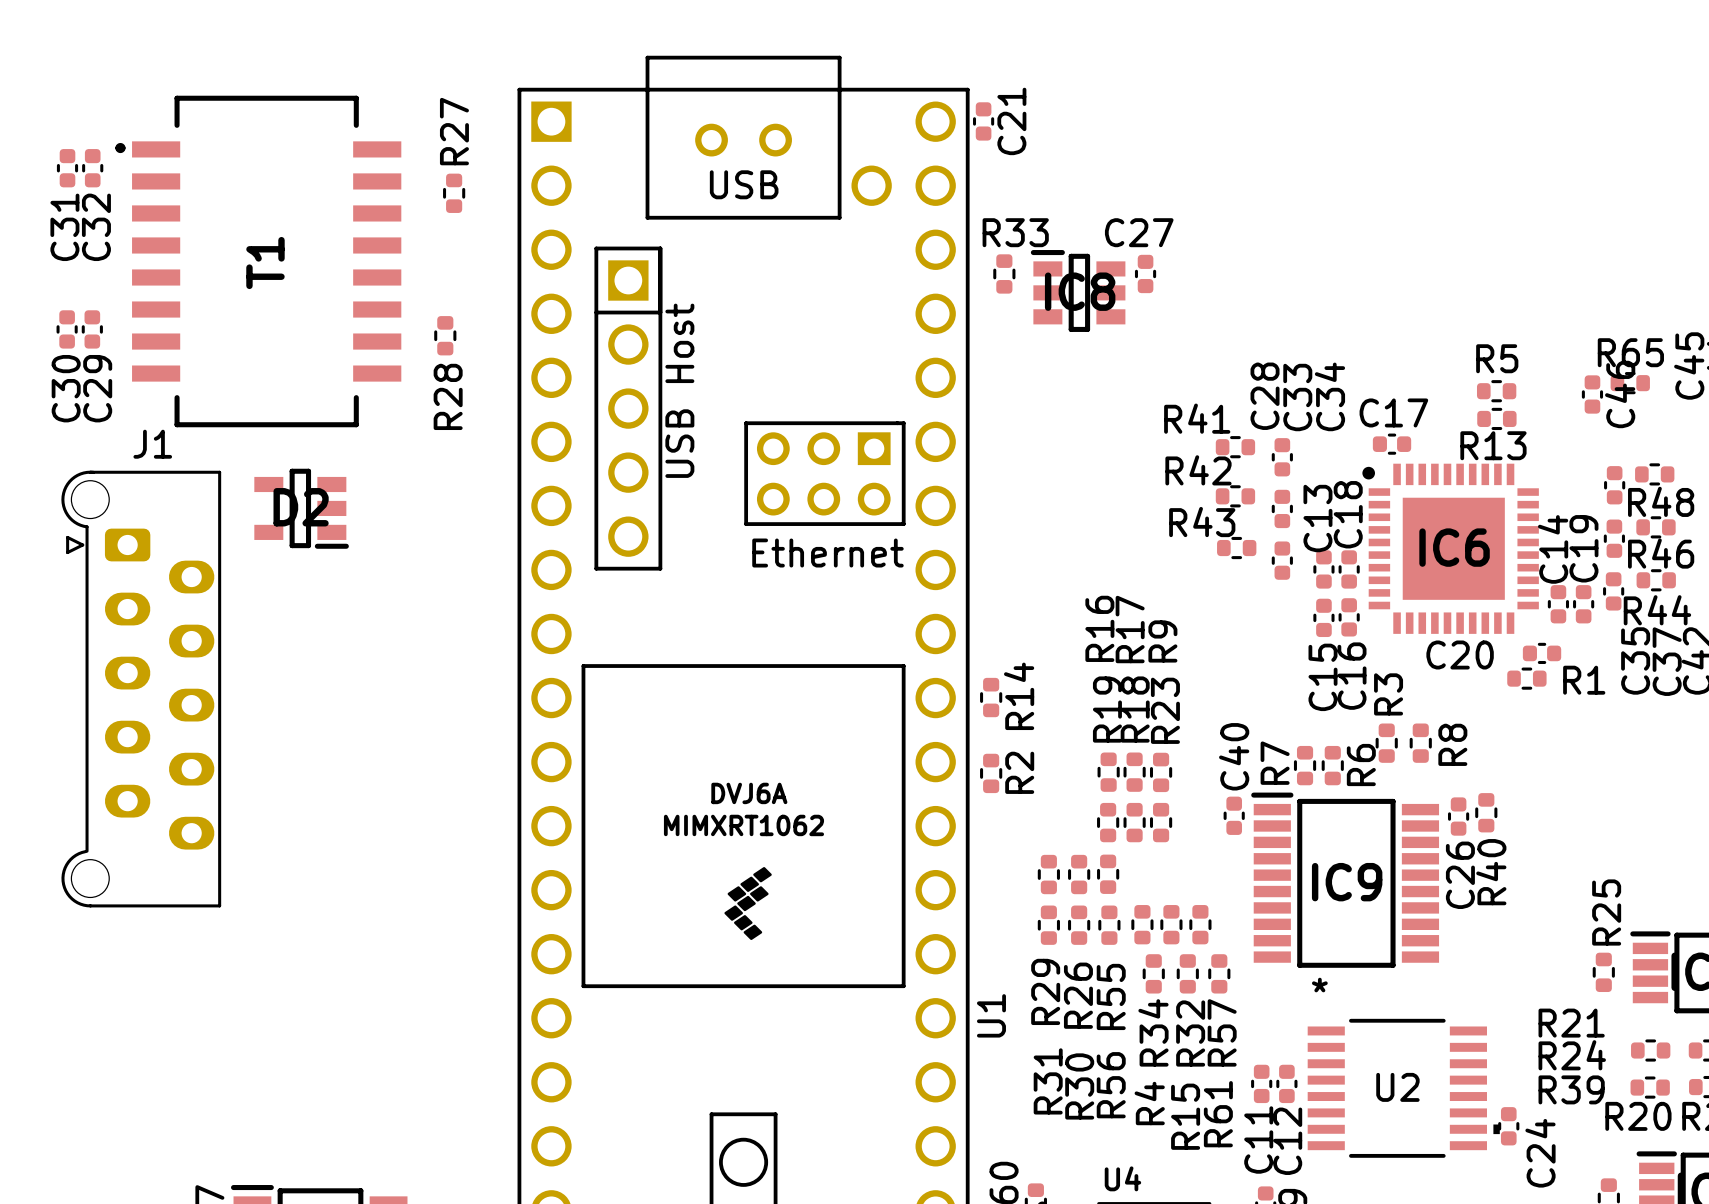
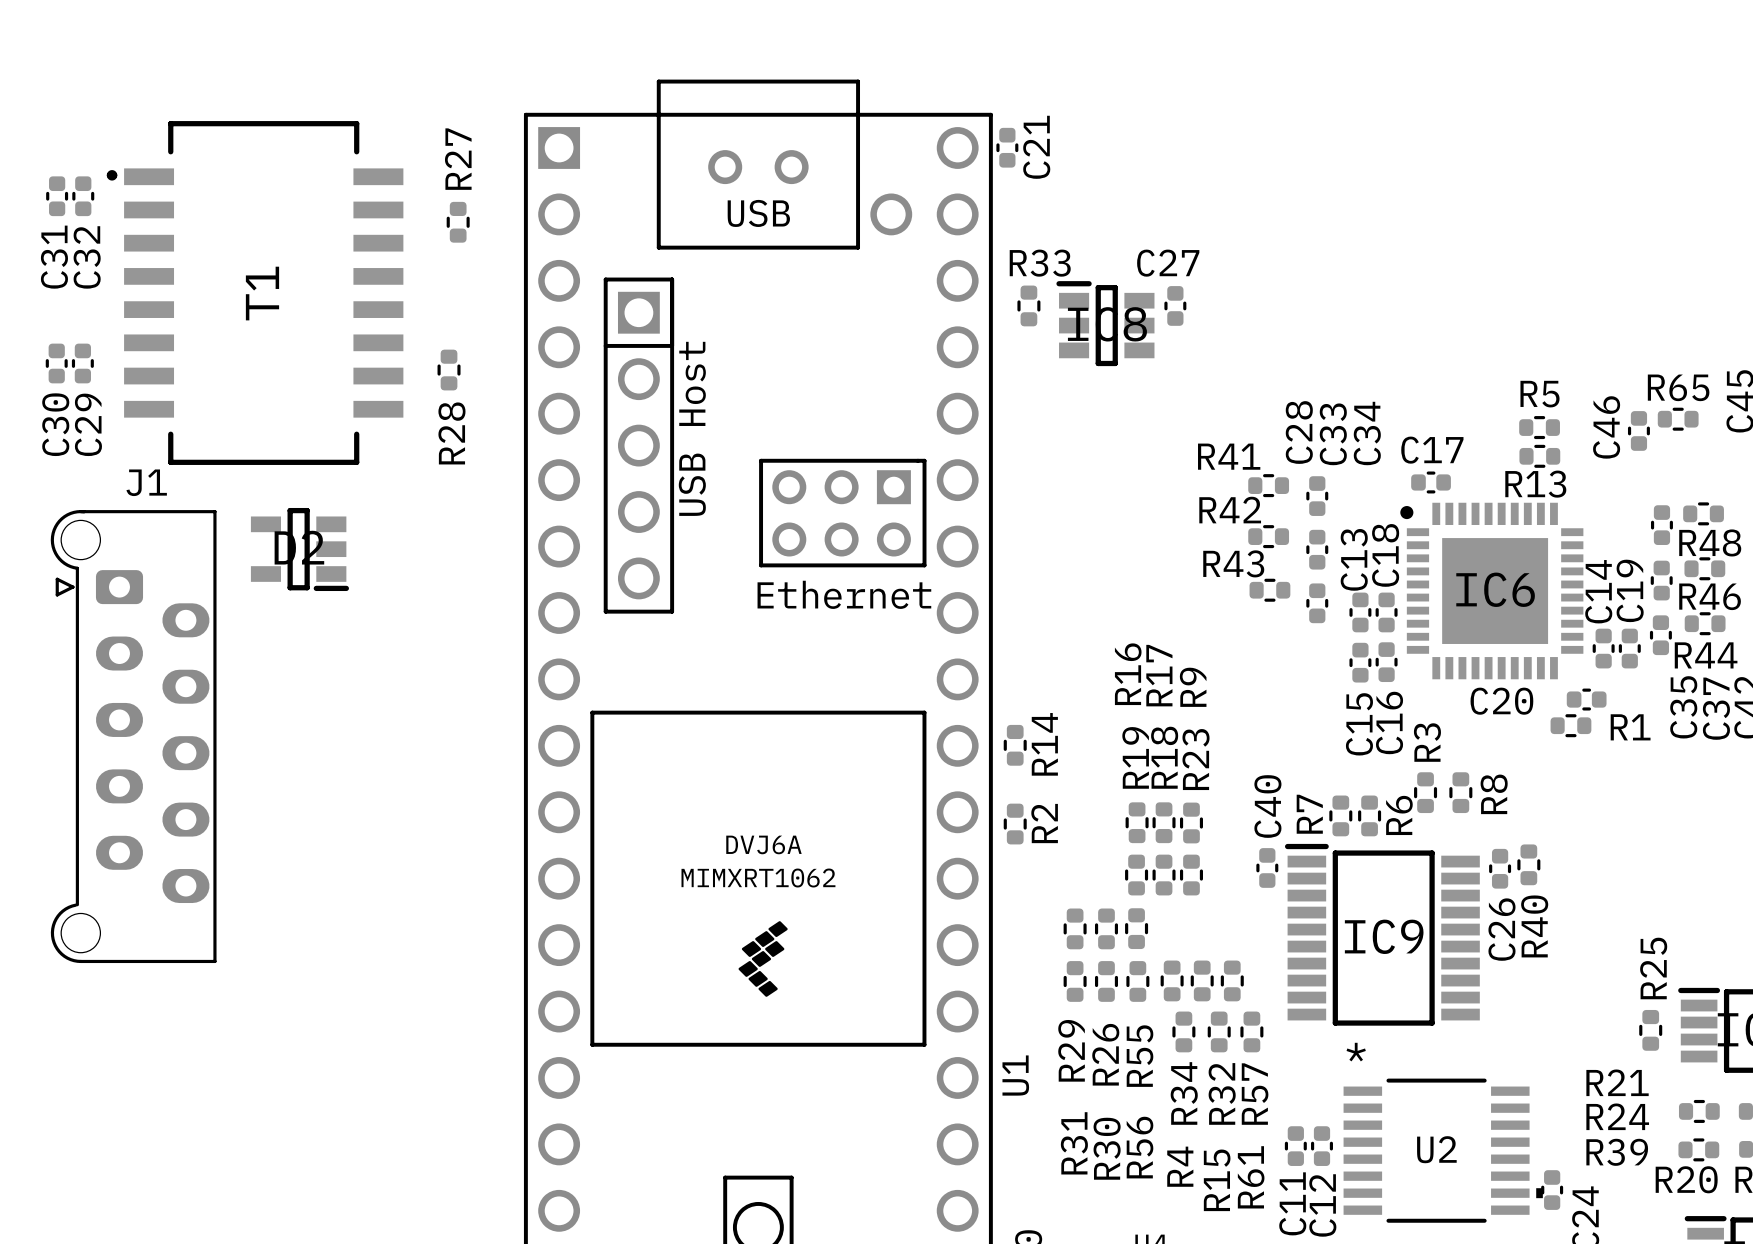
C46 name position: C46 (1620, 394) -> C46 (1606, 427)

